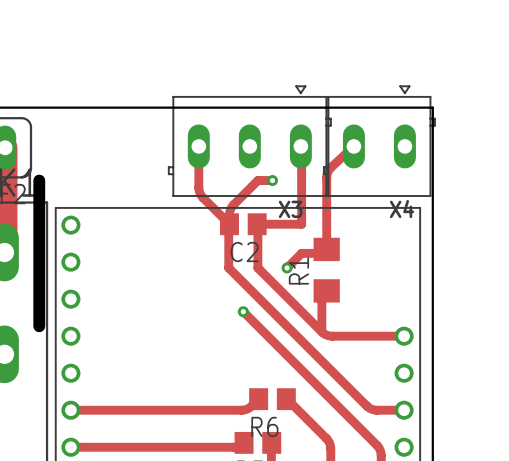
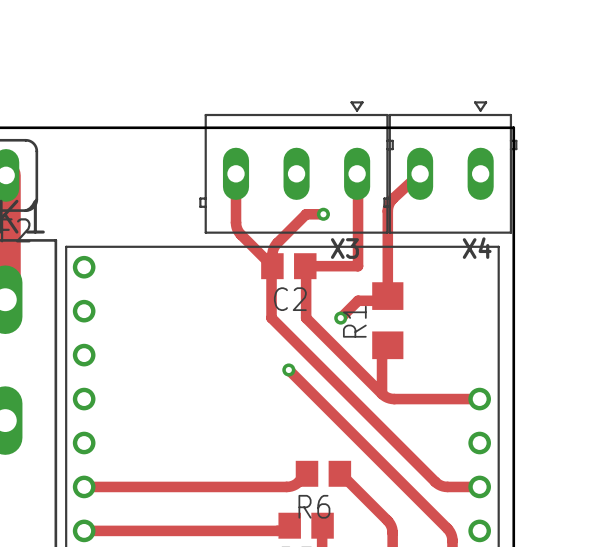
board edge: (39, 180) (39, 326) -> none

